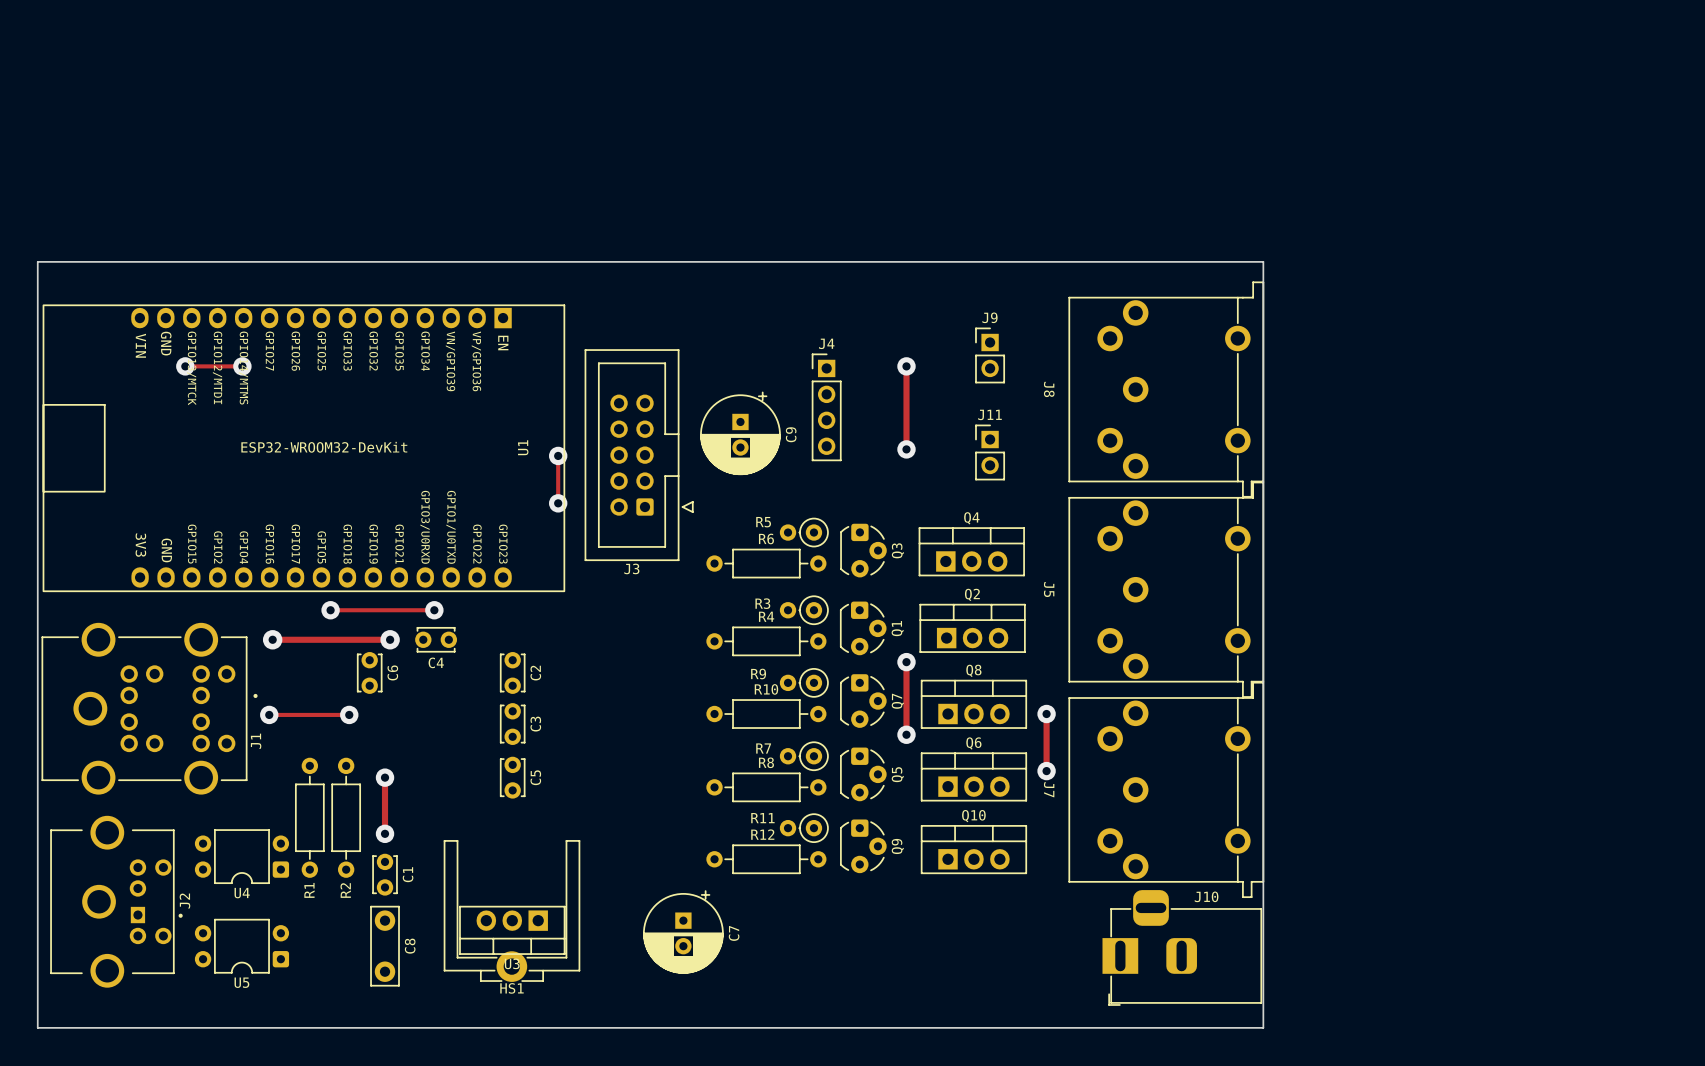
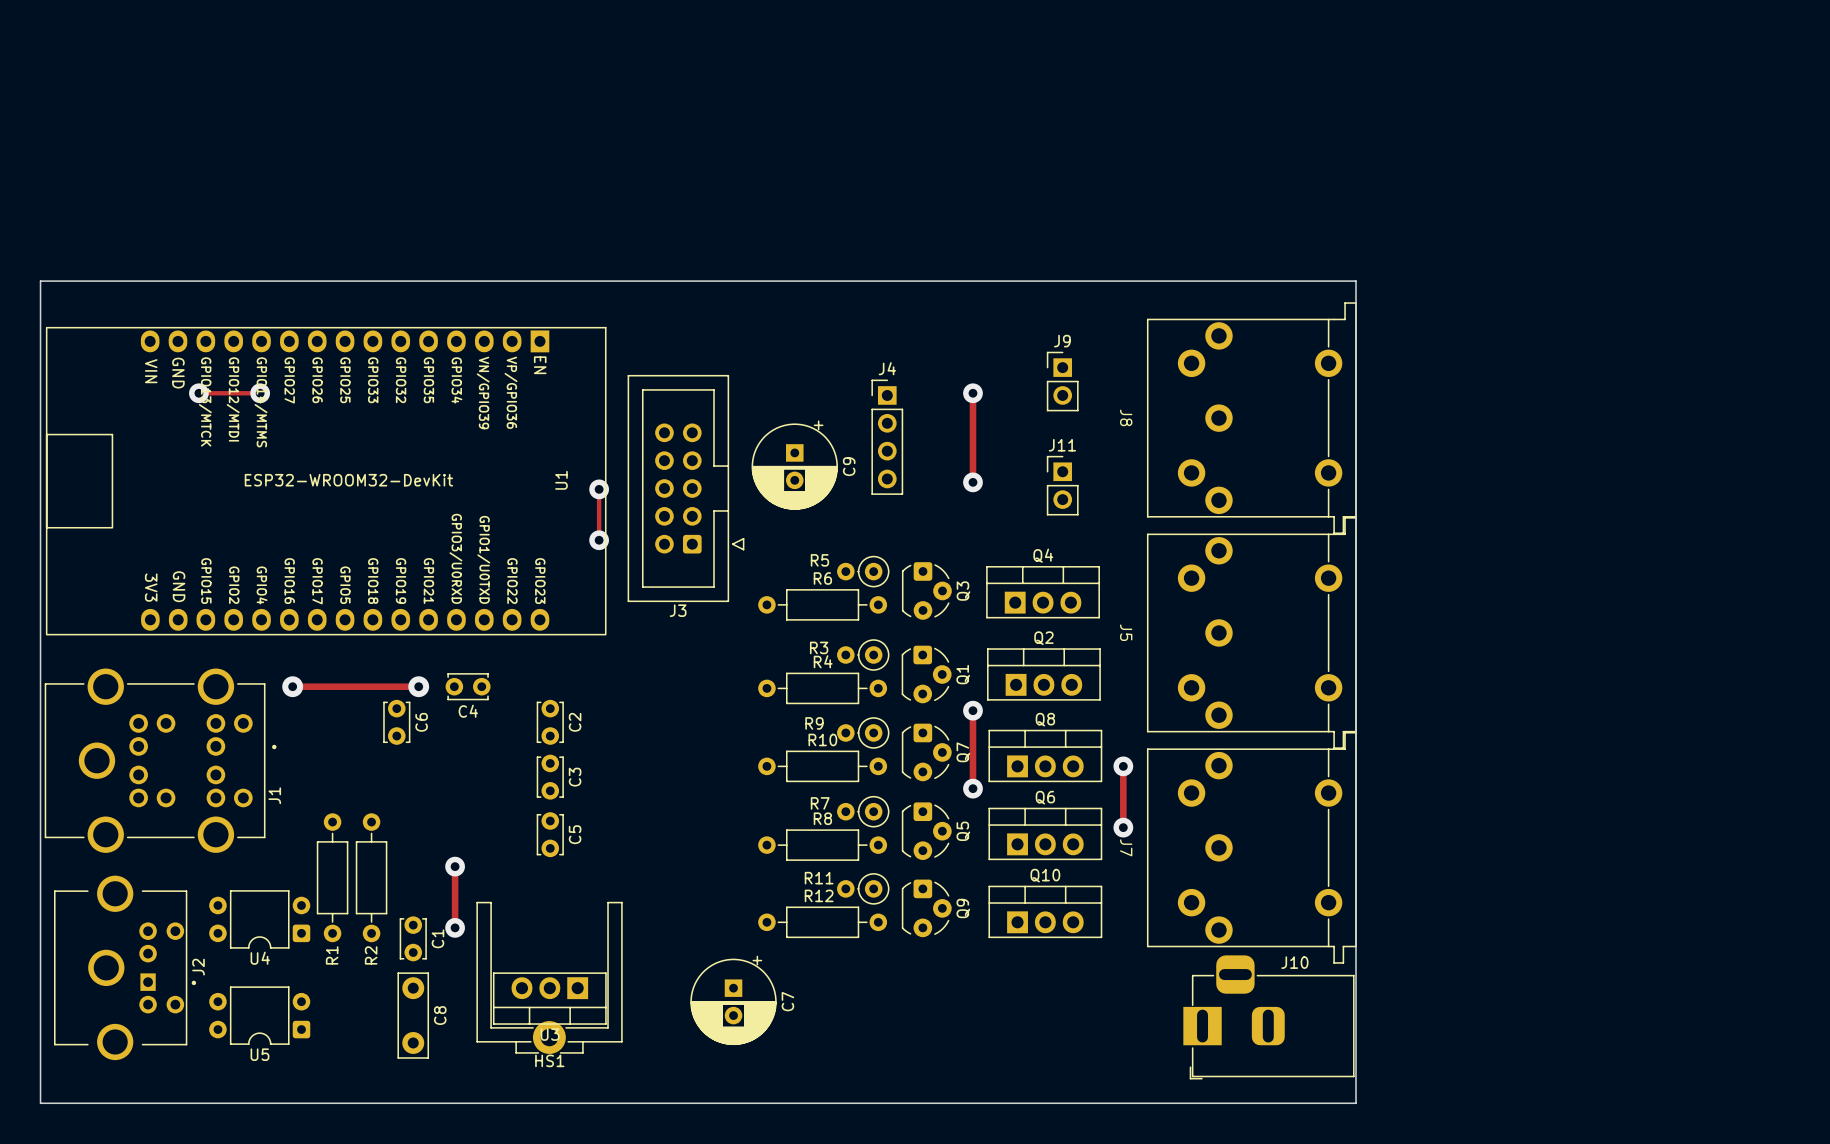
track: (330, 610) (434, 610) -> none
via: (330, 610) -> none
via: (434, 610) -> none
track: (269, 714) (349, 714) -> none
via: (269, 714) -> none
via: (349, 714) -> none
track: (385, 777) (385, 833) -> none
via: (385, 777) -> none
track: none -> (455, 866) (455, 927)
via: none -> (455, 866)
via: (385, 833) -> none
via: none -> (455, 927)

